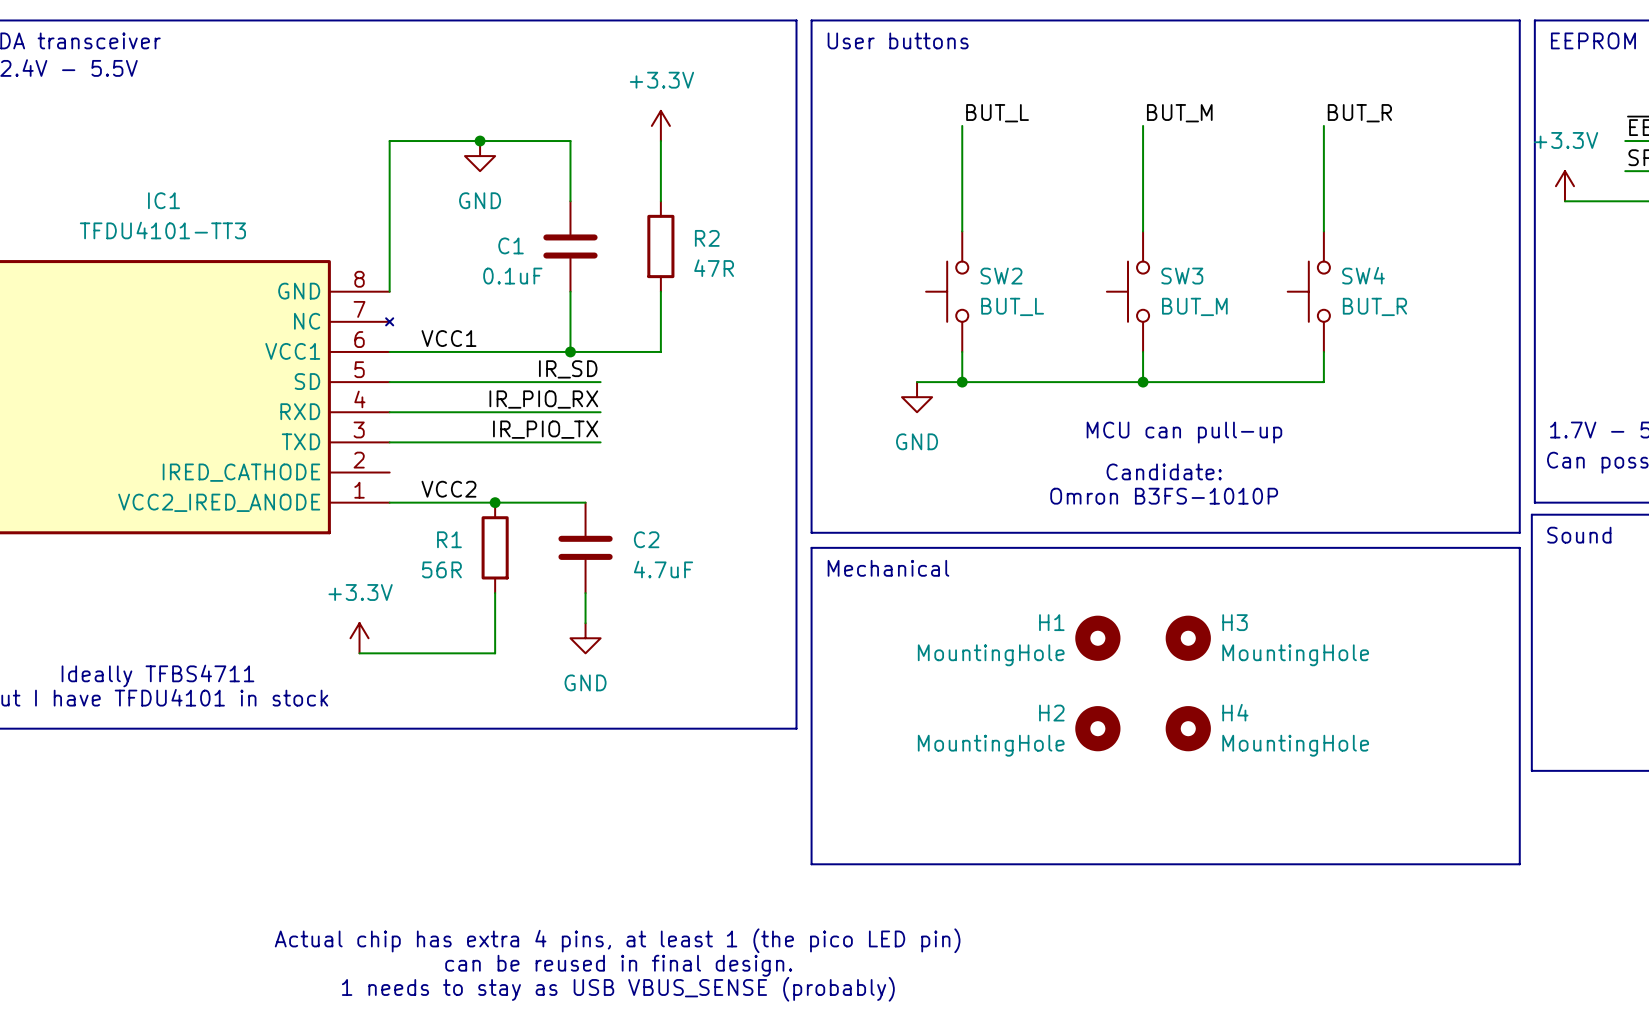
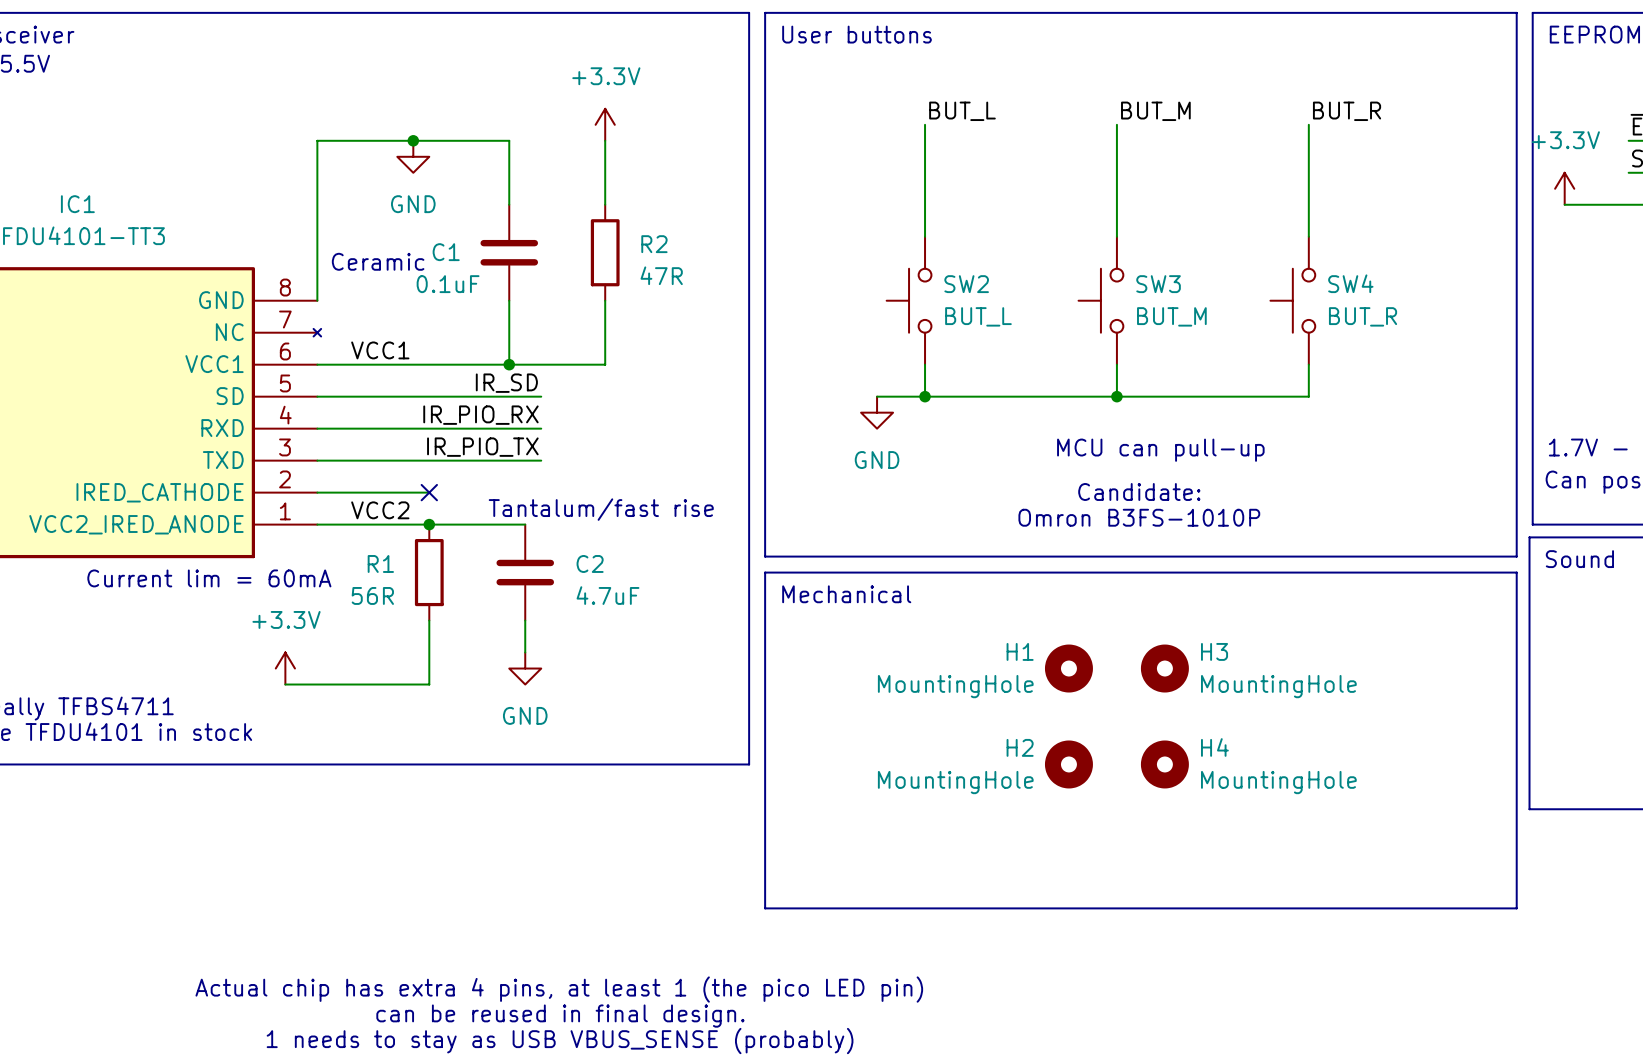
text: none -> Ceramic (378, 261)
wire: none -> (317, 492) (429, 492)
no-connect mark: none -> (429, 492)
text: none -> Tantalum/fast rise (601, 509)
text: none -> Current lim = 60mA (209, 578)

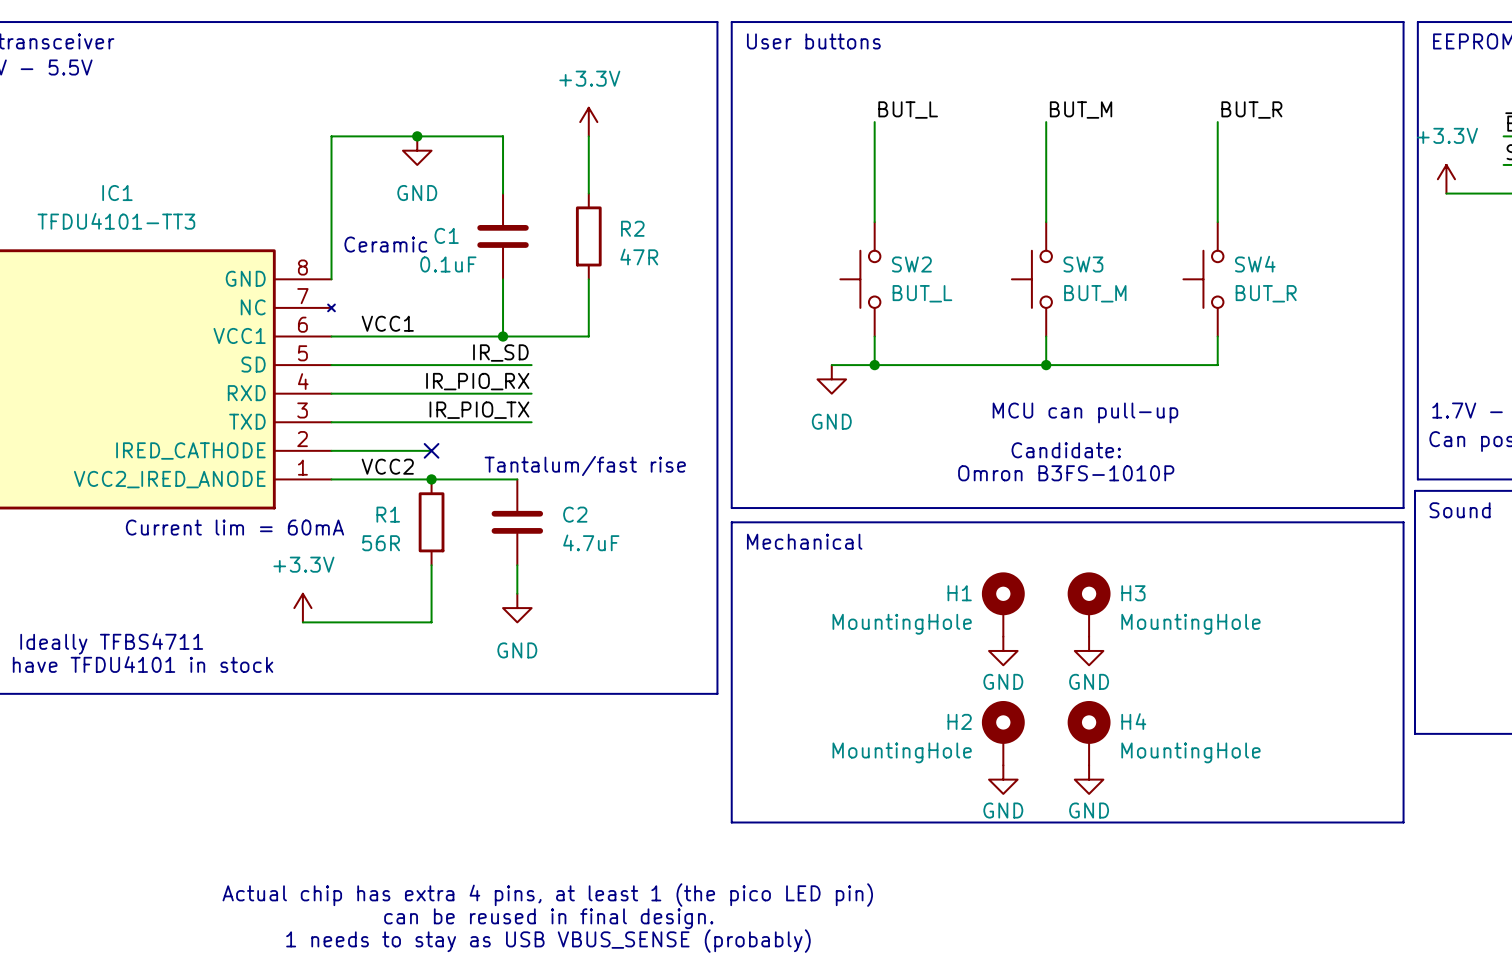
H1 symbol: [1044, 644, 1093, 693] -> [981, 572, 1025, 637]
H3 symbol: [1140, 644, 1189, 693] -> [1067, 572, 1111, 637]
power symbol: none -> GND (1003, 650)
power symbol: none -> GND (1089, 650)
H2 symbol: [1044, 740, 1093, 789] -> [981, 701, 1025, 766]
H4 symbol: [1140, 740, 1189, 789] -> [1067, 701, 1111, 766]
power symbol: none -> GND (1003, 779)
power symbol: none -> GND (1089, 779)

